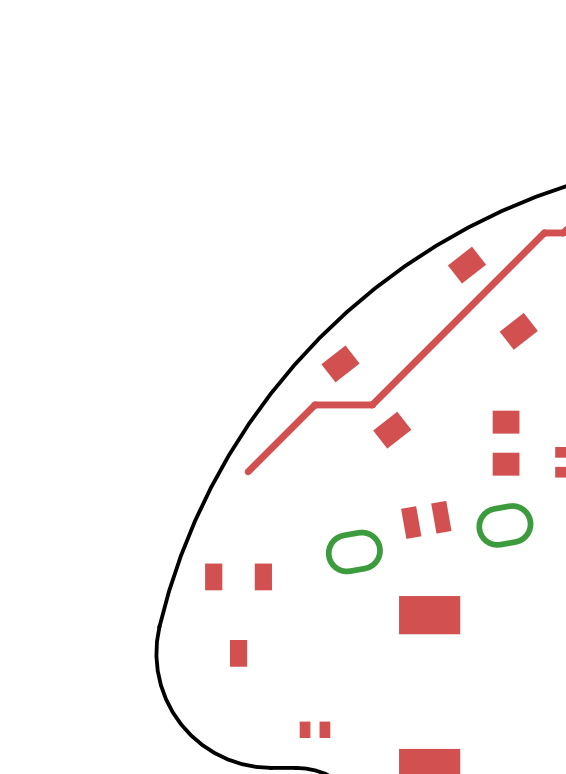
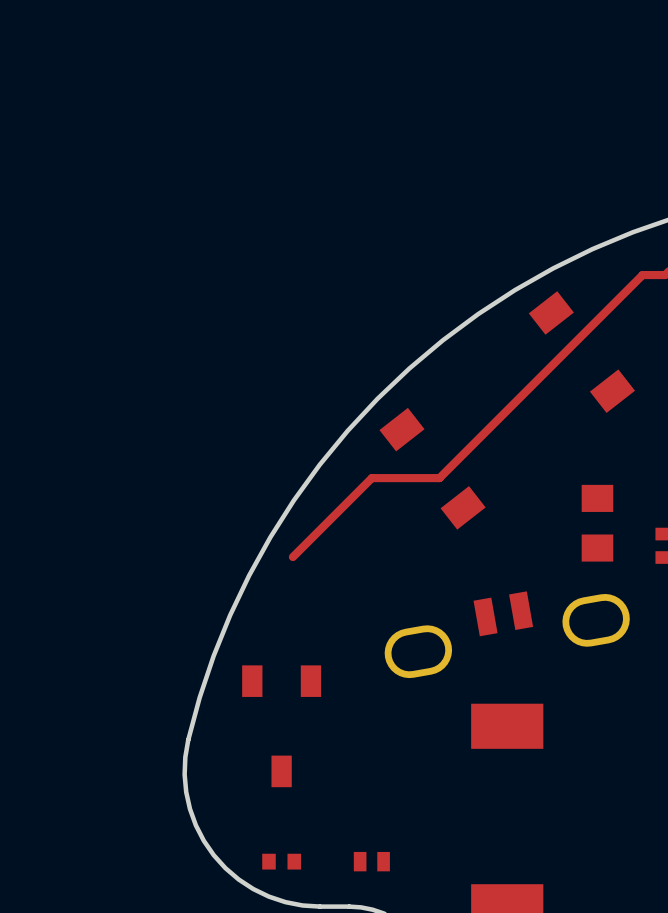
part: none -> (281, 861)

